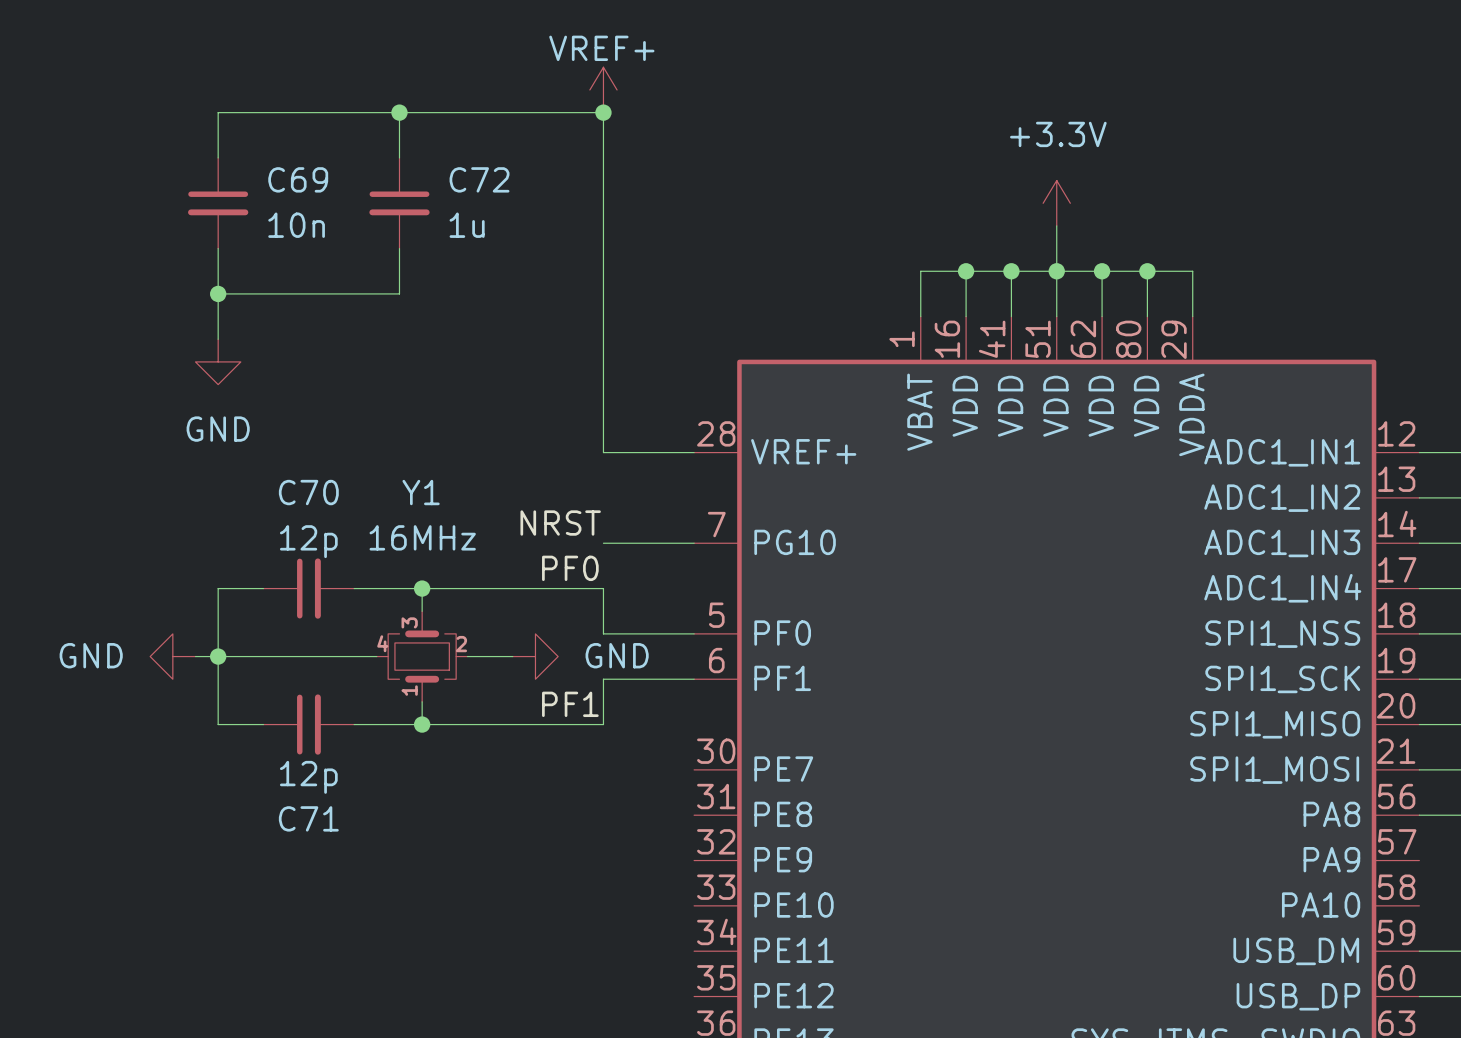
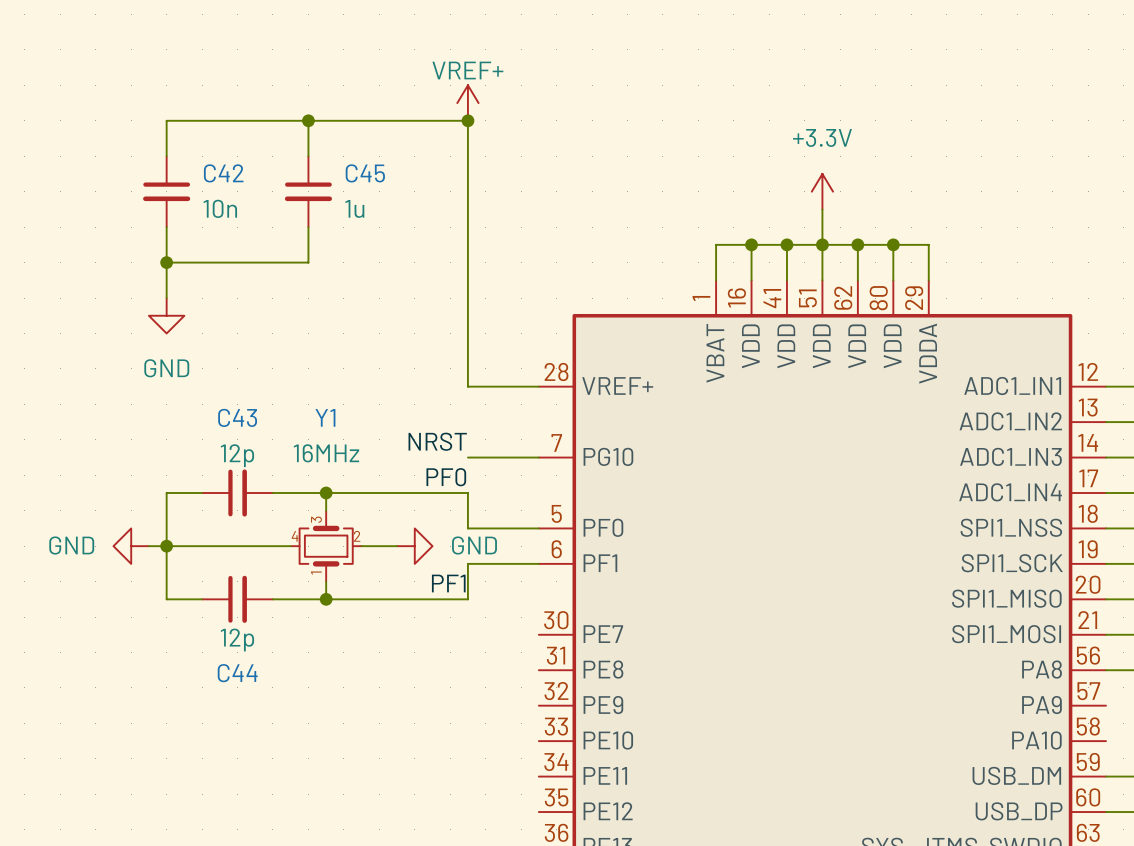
C69 name: C69 (298, 179) -> C42 (223, 173)
C72 name: C72 (479, 179) -> C45 (365, 173)
C70 name: C70 (308, 492) -> C43 (237, 417)
C71 name: C71 (308, 818) -> C44 (237, 673)

